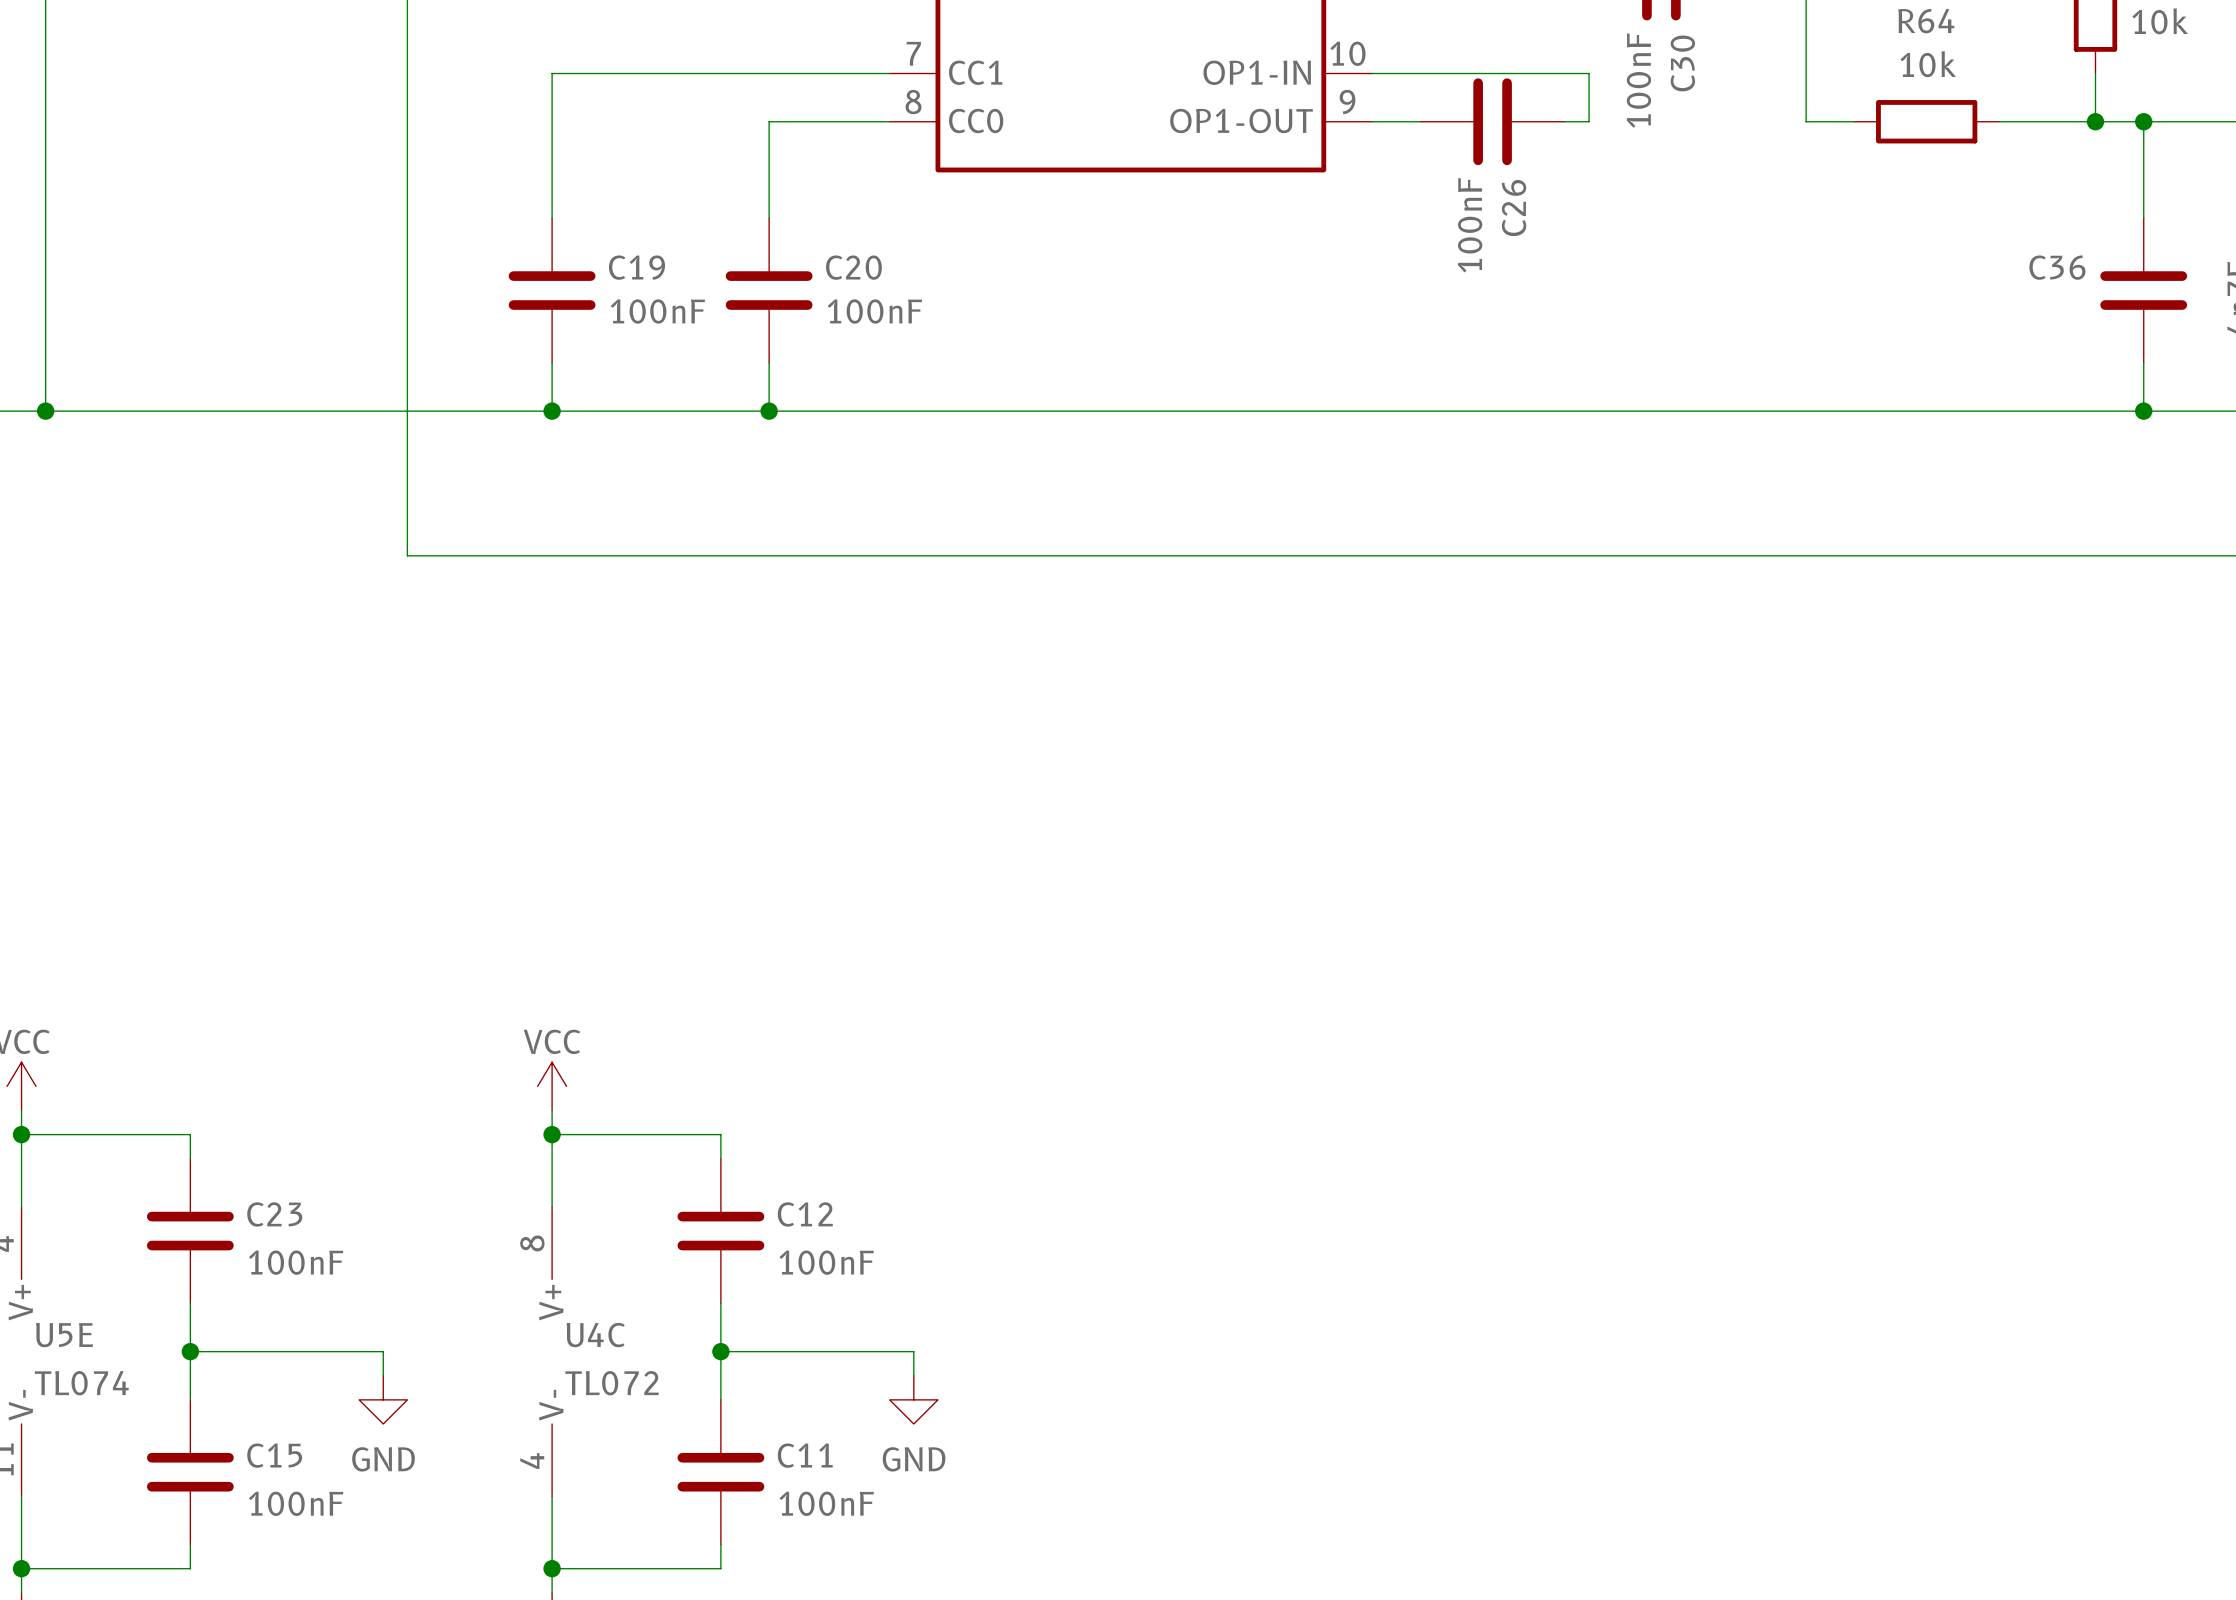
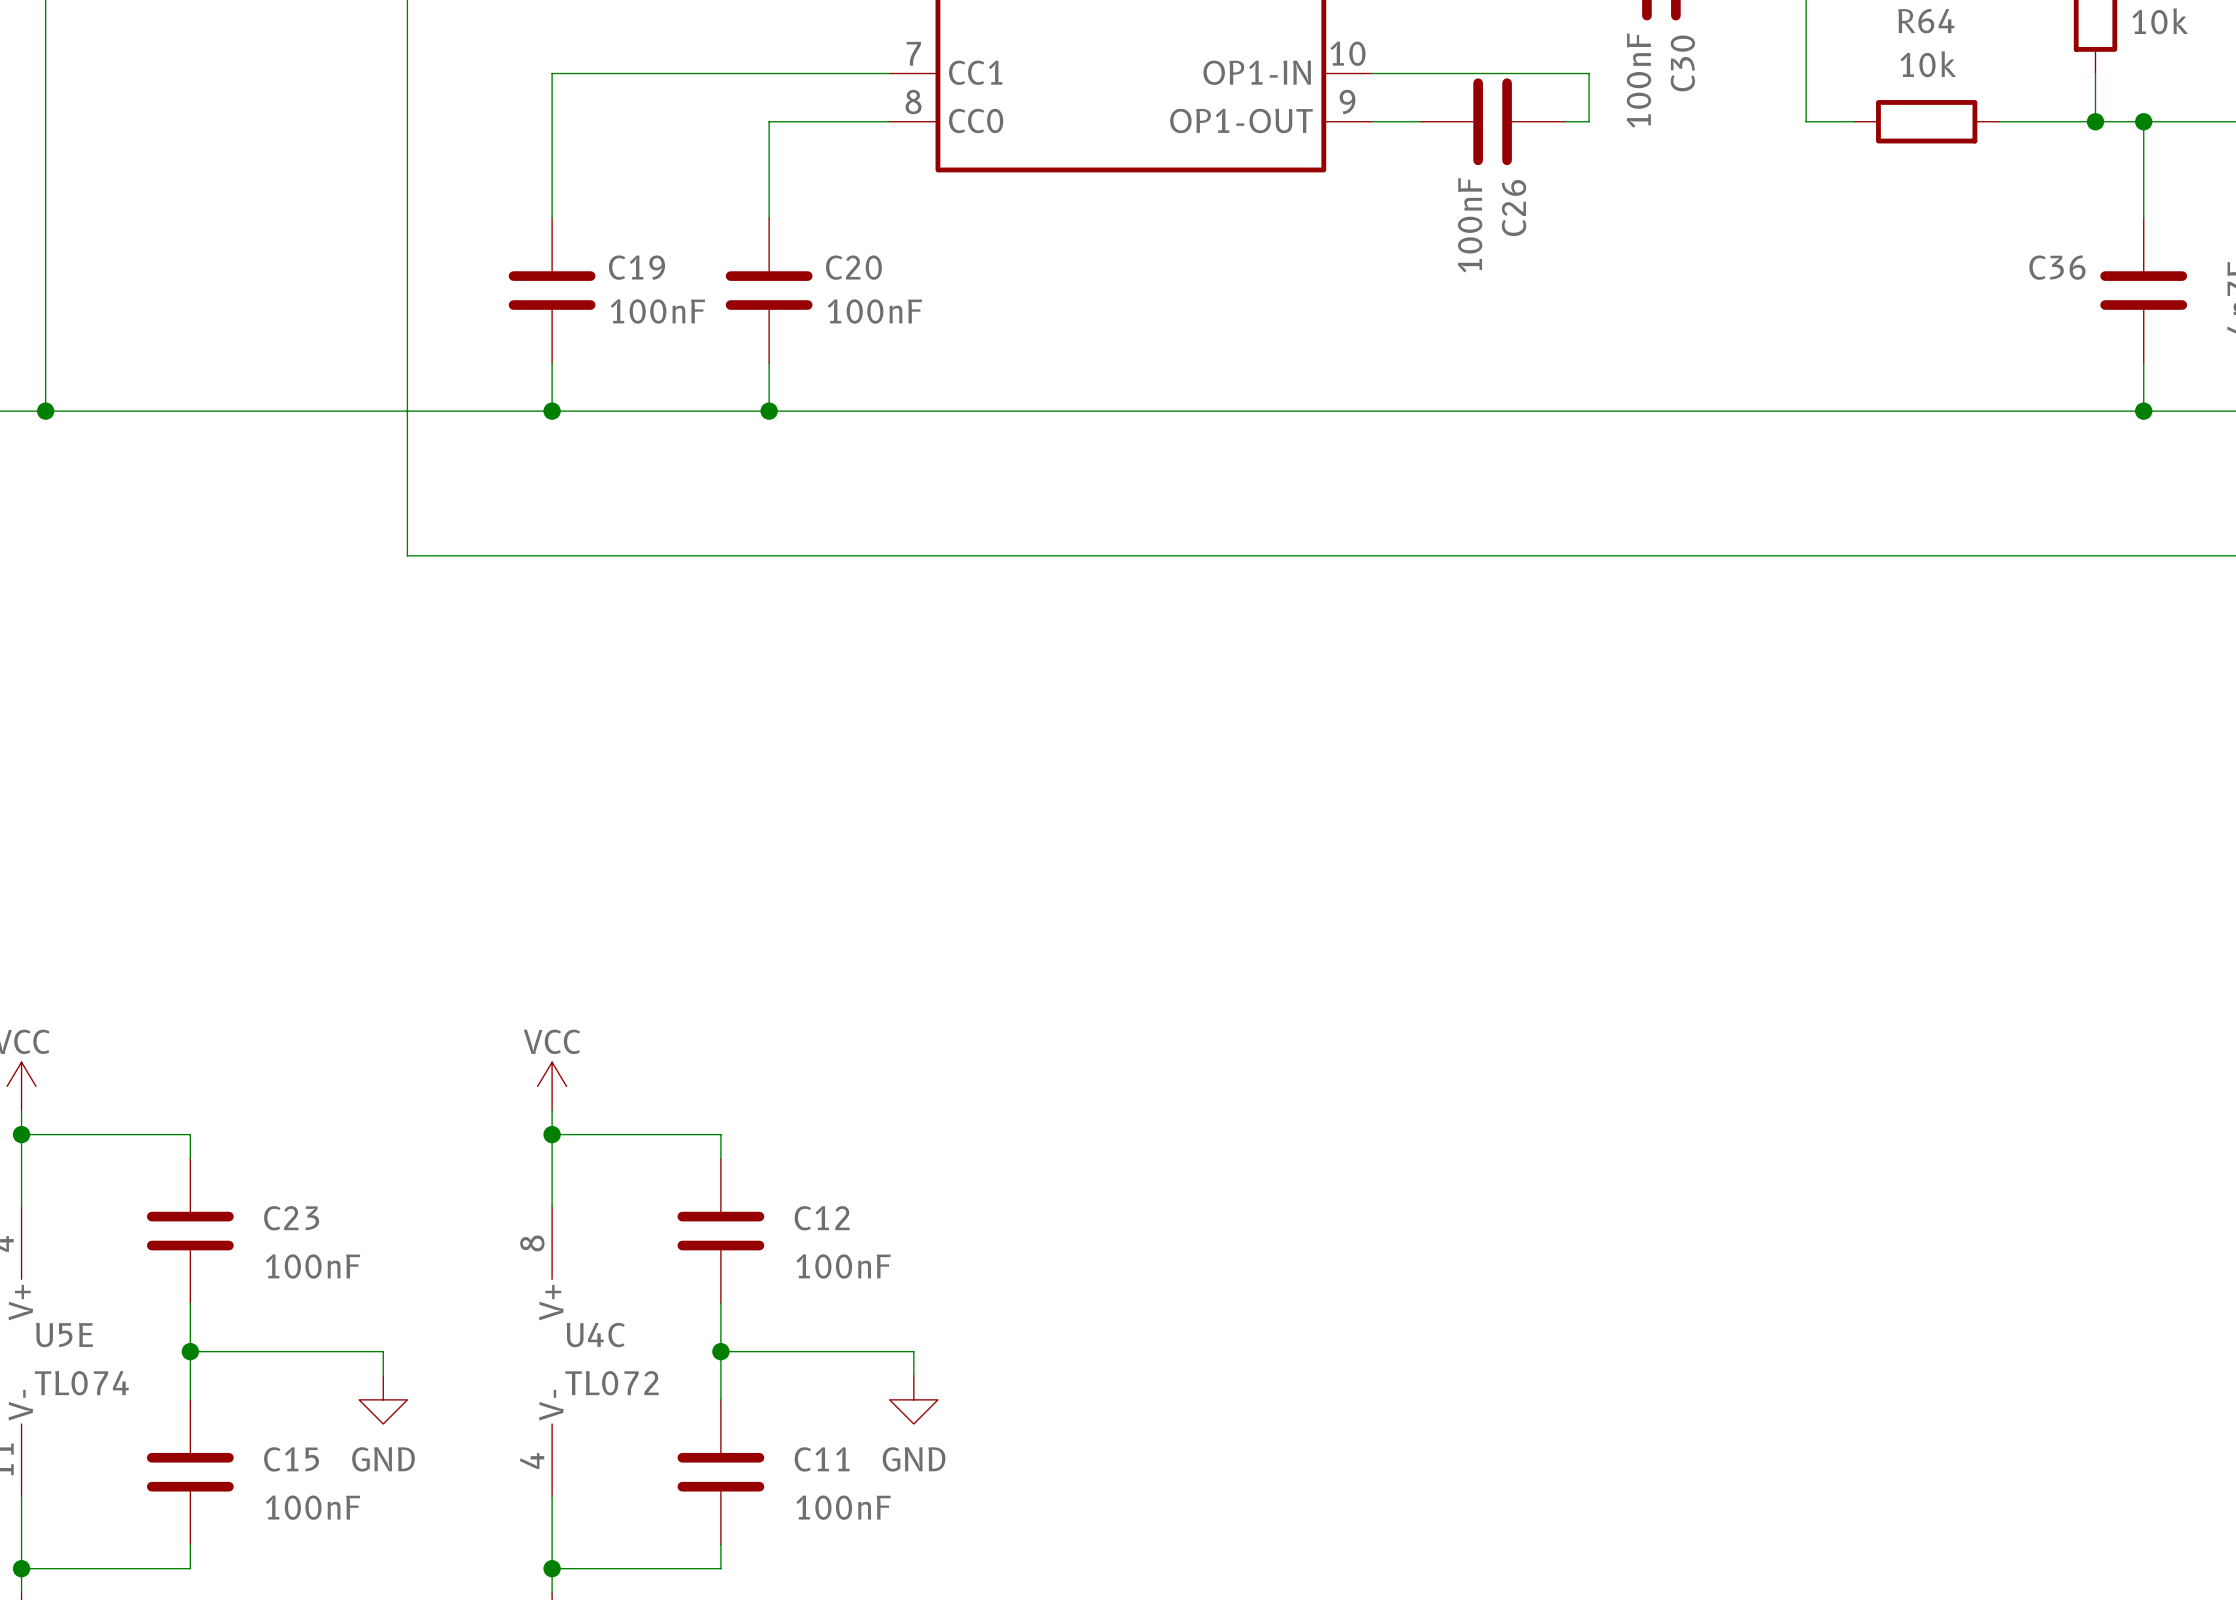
C23 name position: C23 (274, 1214) -> C23 (291, 1218)
C12 name position: C12 (805, 1214) -> C12 (822, 1218)
C23 value position: 100nF (296, 1262) -> 100nF (313, 1266)
C12 value position: 100nF (826, 1262) -> 100nF (843, 1266)
C15 name position: C15 (274, 1455) -> C15 (291, 1459)
C11 name position: C11 (805, 1455) -> C11 (822, 1459)
C15 value position: 100nF (296, 1503) -> 100nF (313, 1507)
C11 value position: 100nF (826, 1503) -> 100nF (843, 1507)

